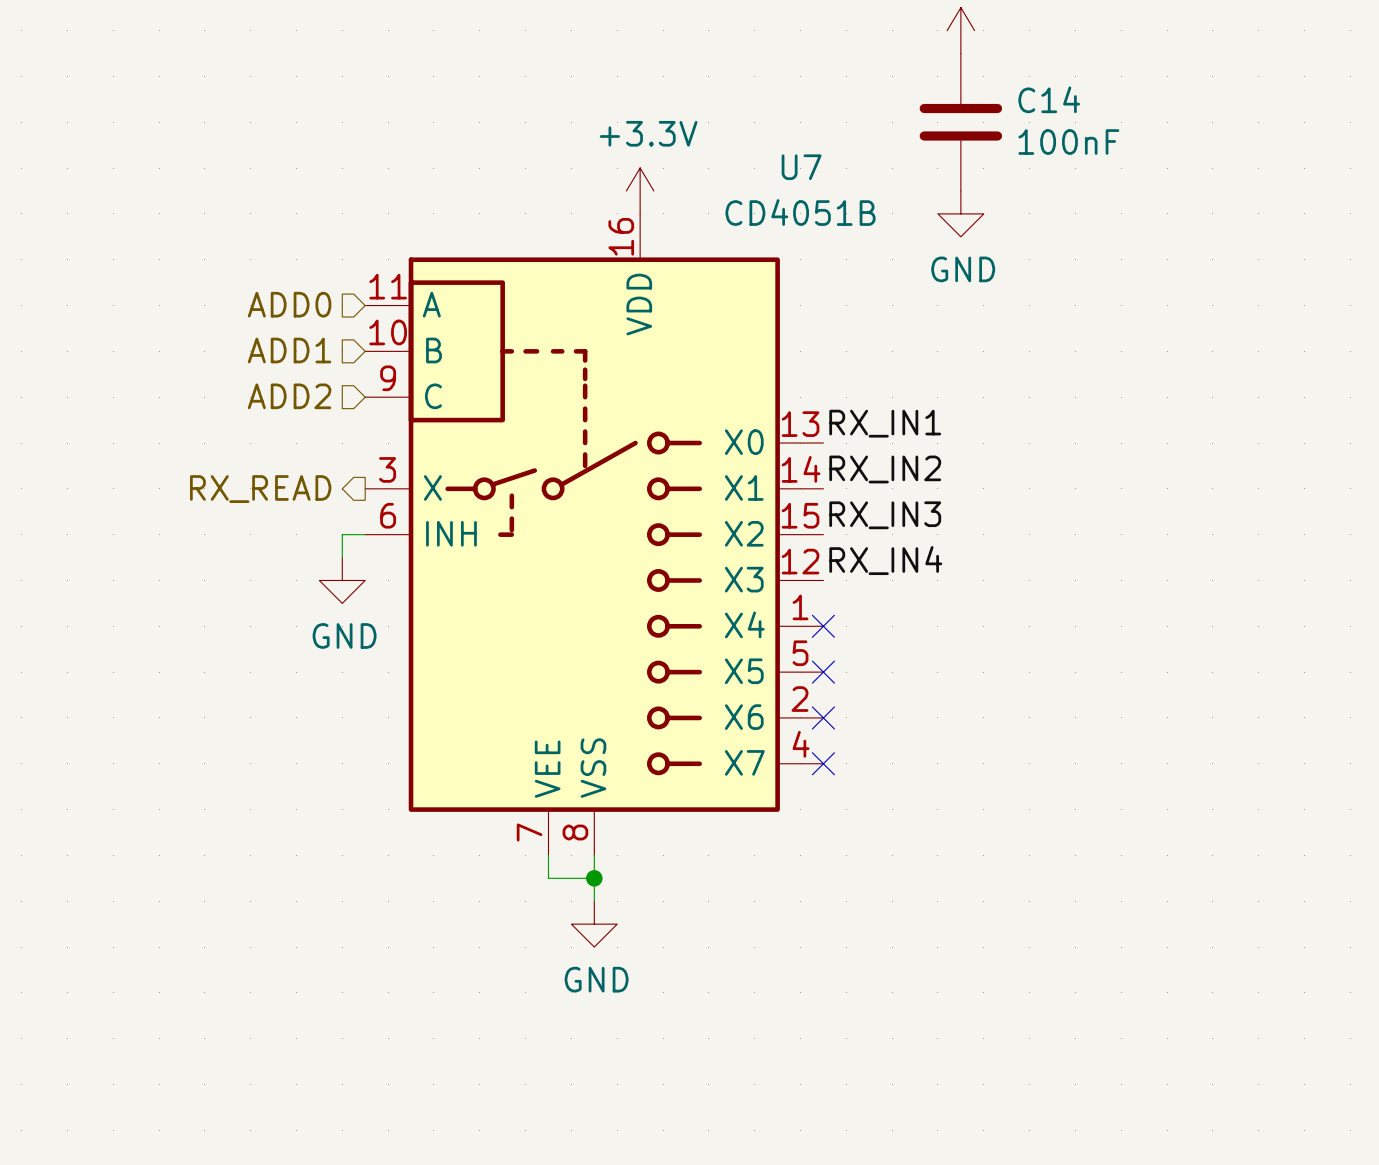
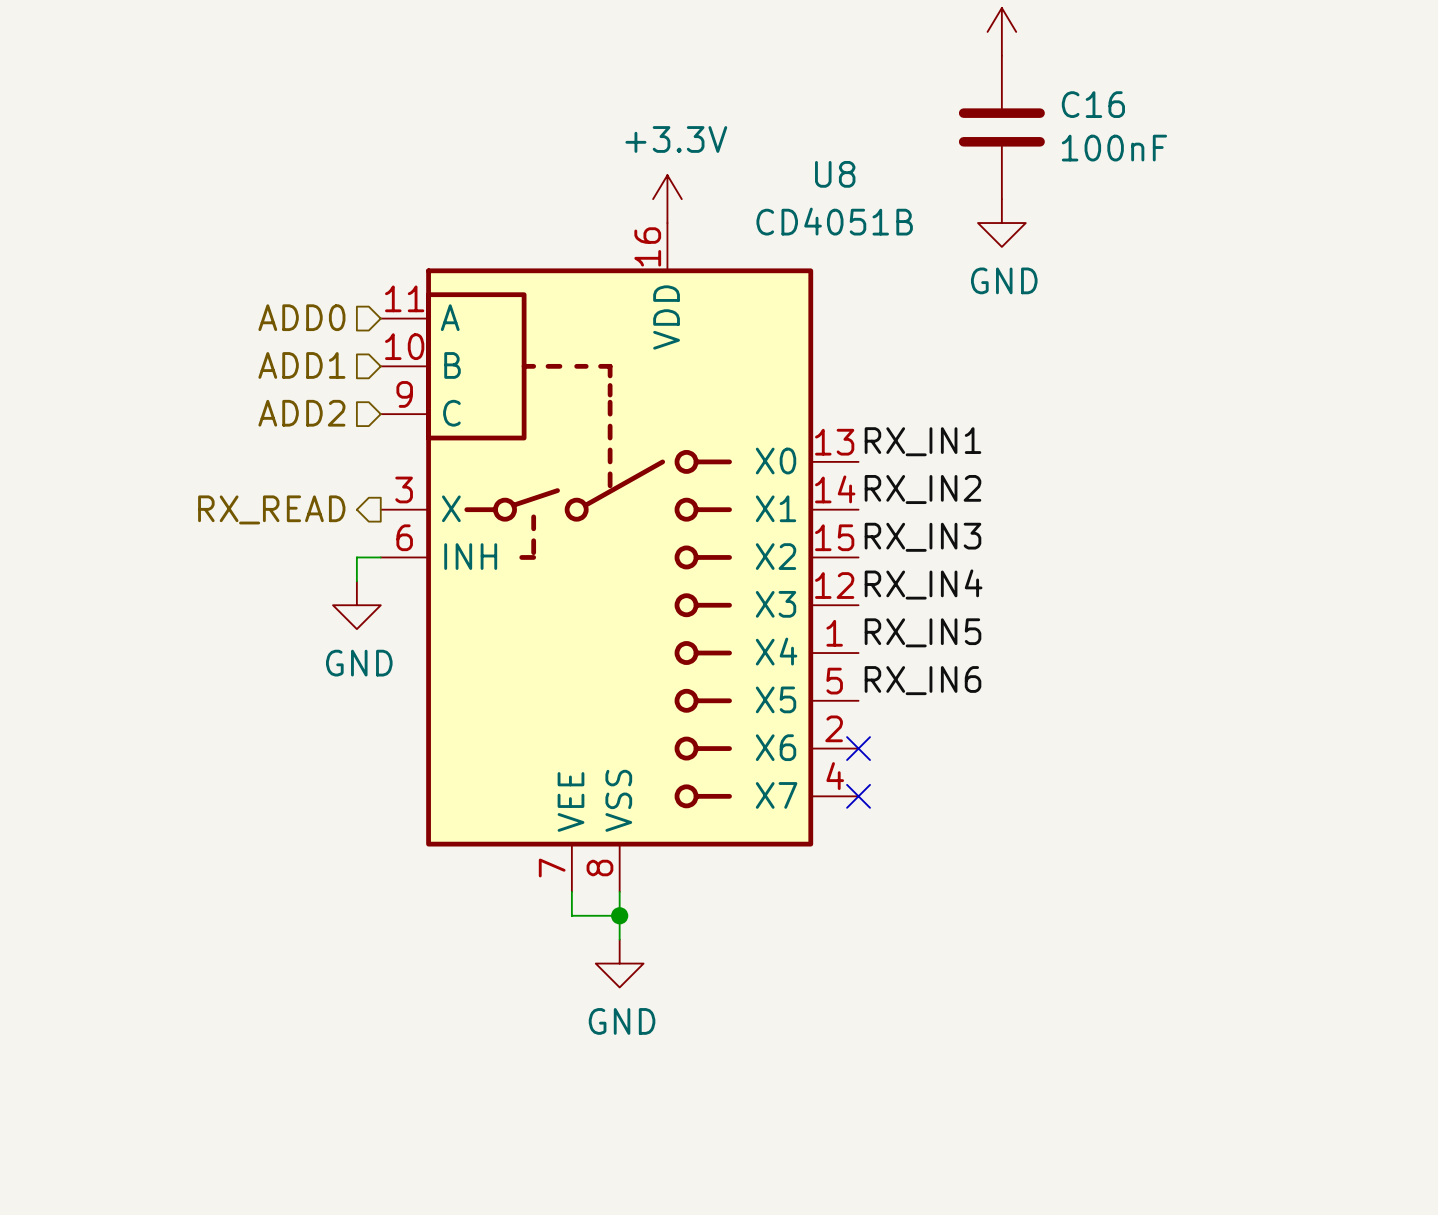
C14 name: C14 (1049, 99) -> C16 (1093, 104)
U7 name: U7 (801, 167) -> U8 (835, 174)
label: none -> RX_IN5 (922, 632)
no-connect mark: (823, 626) -> none
label: none -> RX_IN6 (922, 680)
no-connect mark: (823, 672) -> none

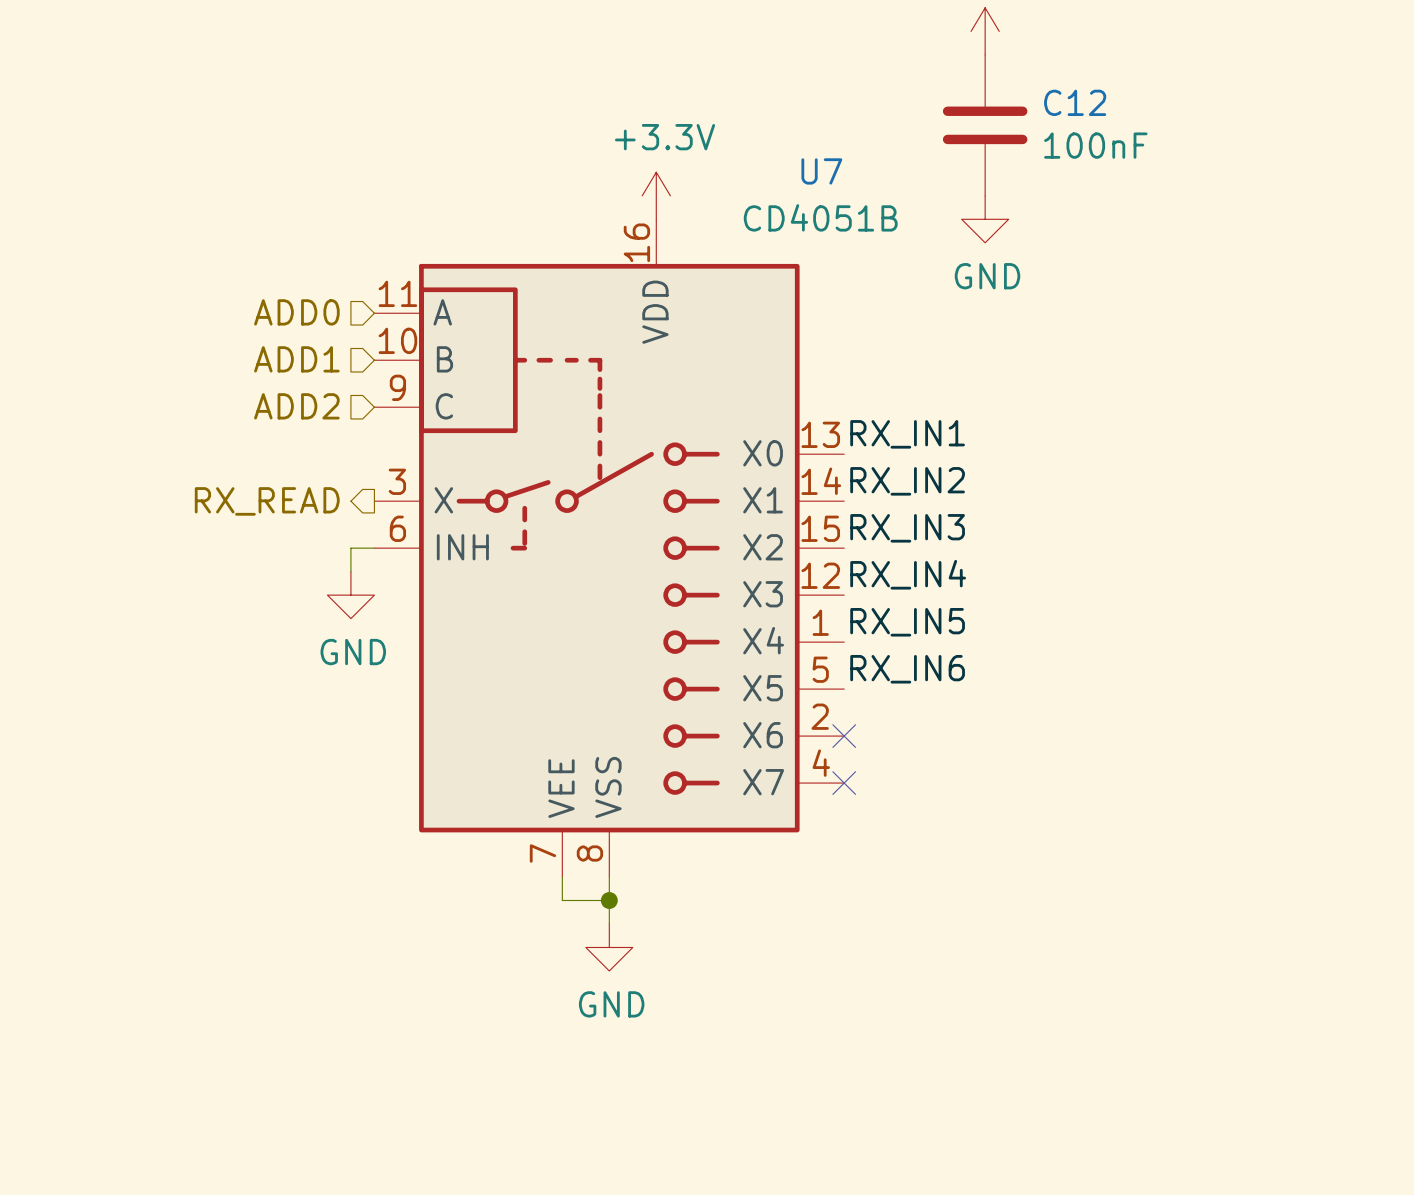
C16 name: C16 (1093, 104) -> C12 (1075, 102)
U8 name: U8 (835, 174) -> U7 (821, 171)

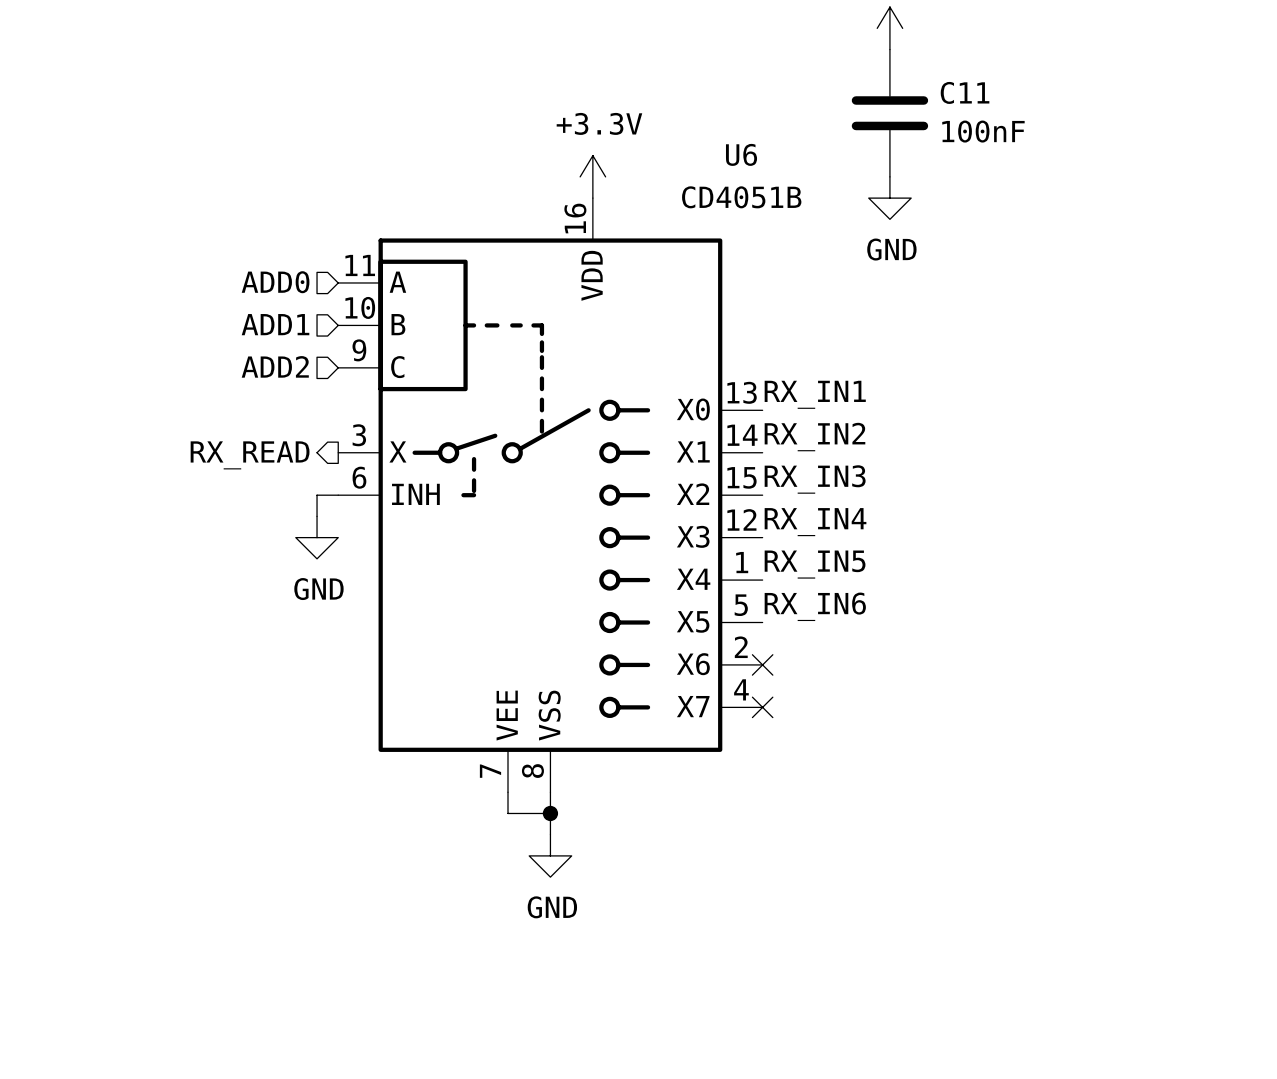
C12 name: C12 (1075, 102) -> C11 (965, 92)
U7 name: U7 (821, 171) -> U6 (741, 154)

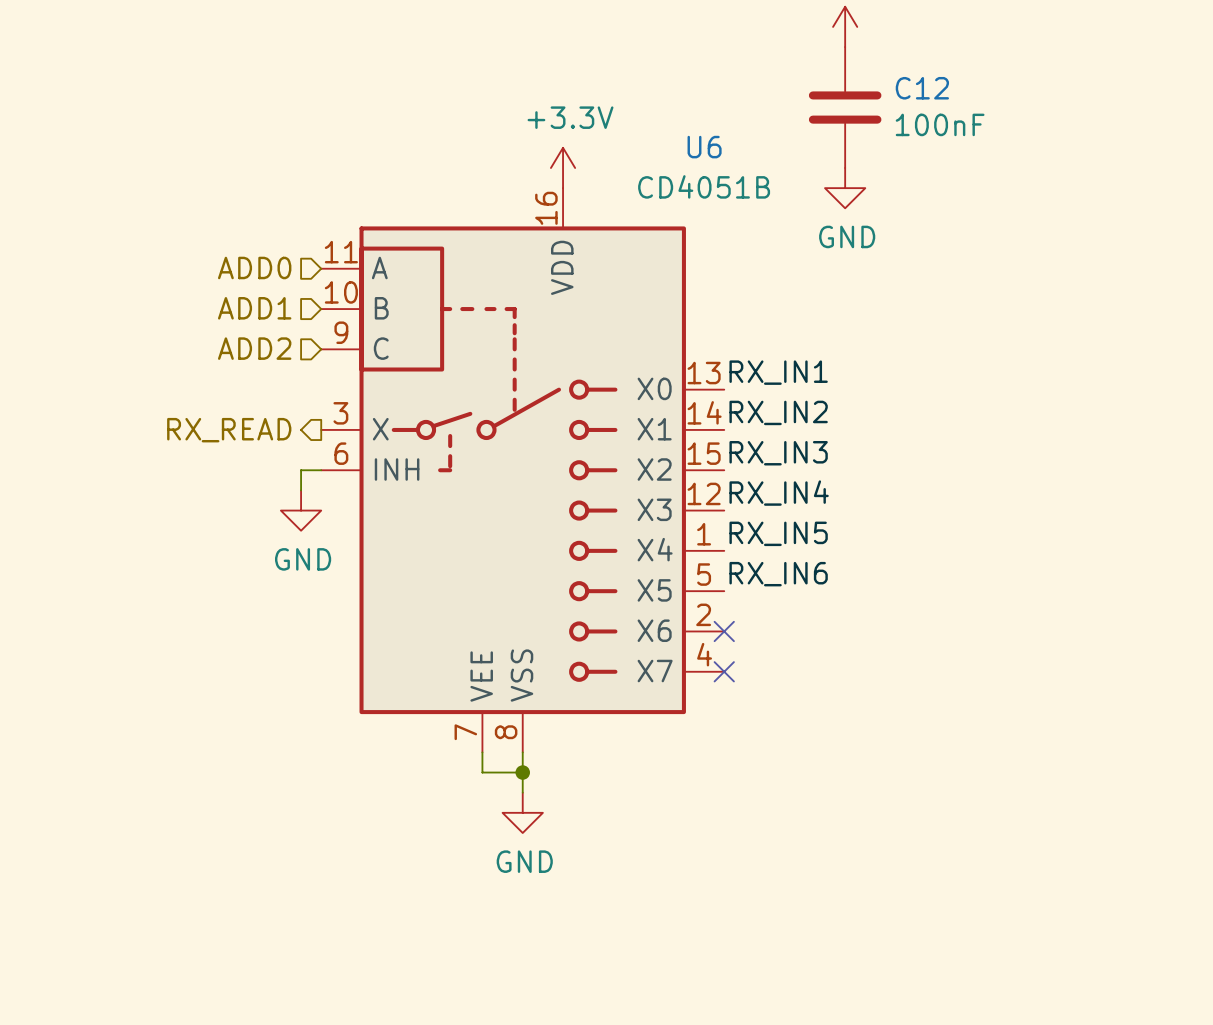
C11 name: C11 (965, 92) -> C12 (922, 88)

